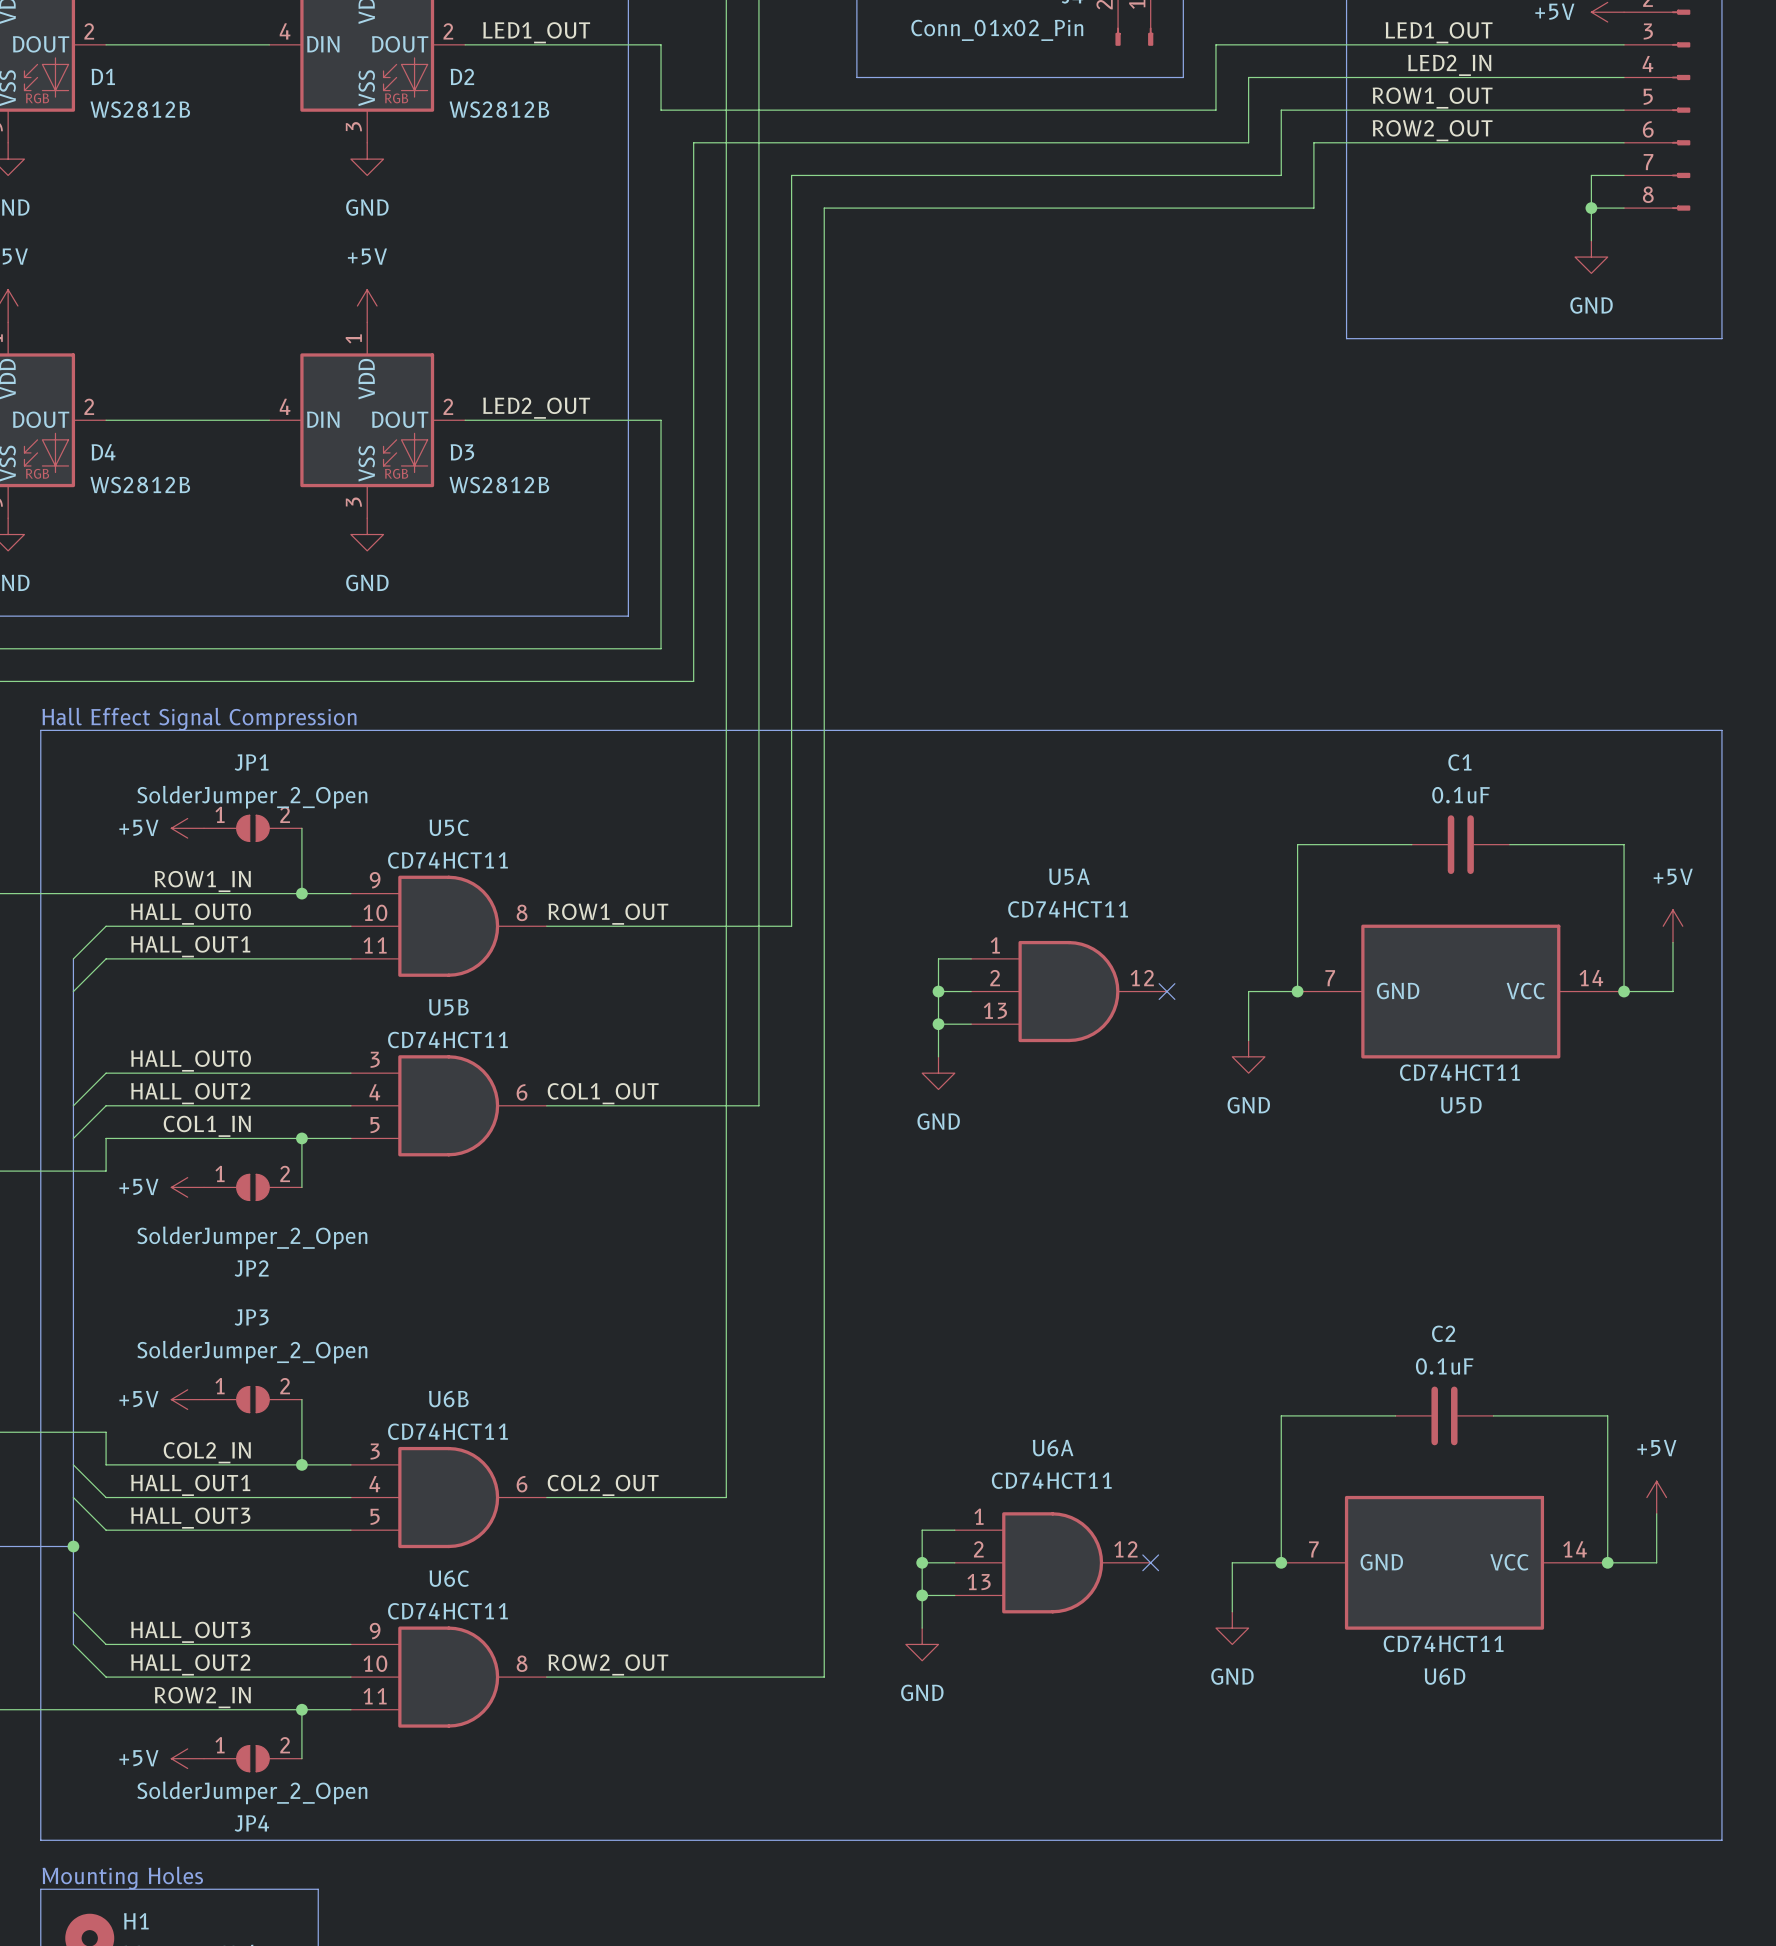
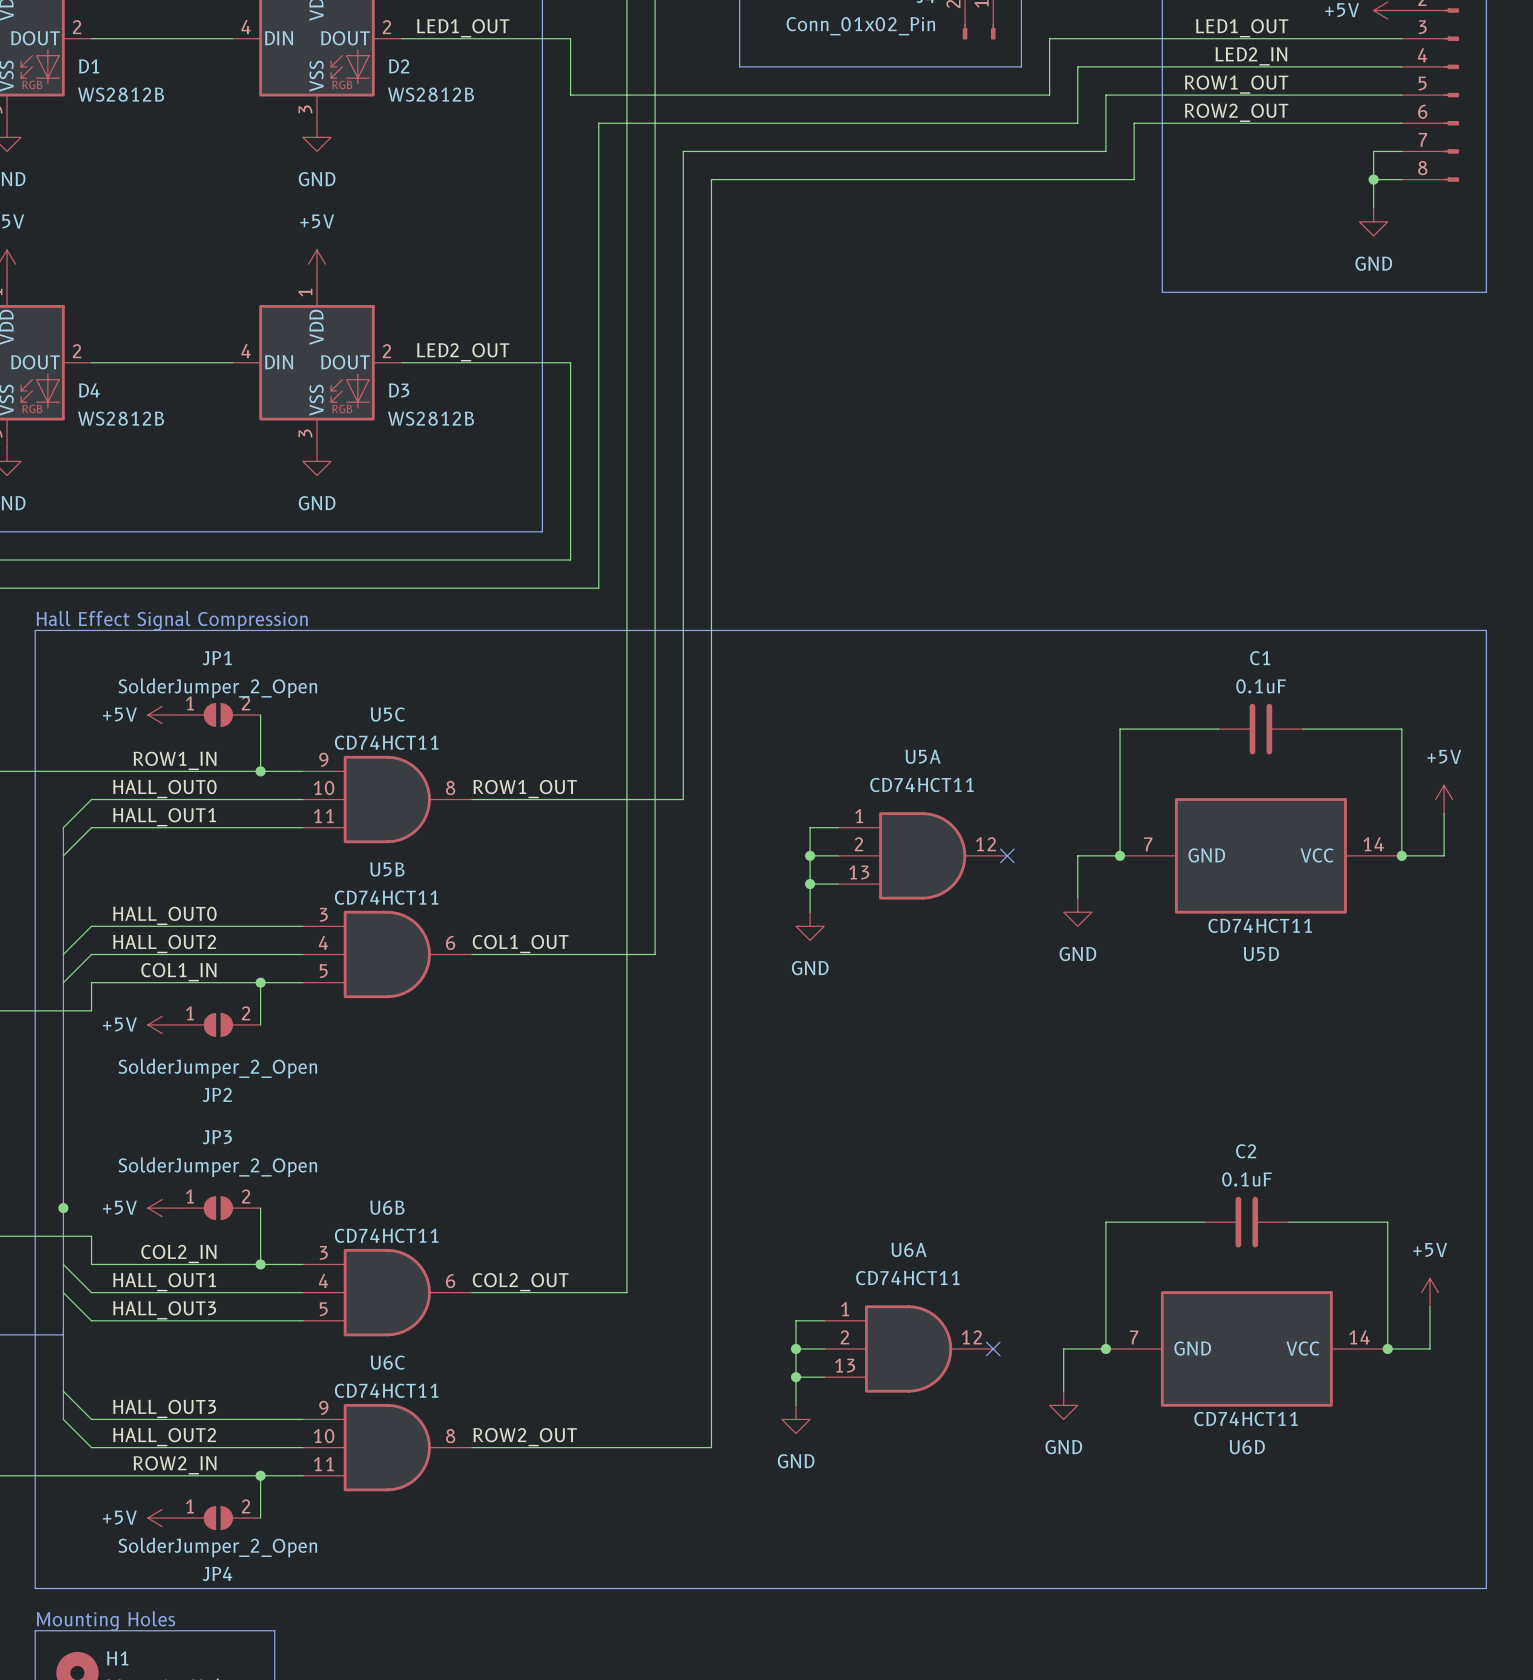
junction: none -> (63, 1208)
junction: (73, 1546) -> none

